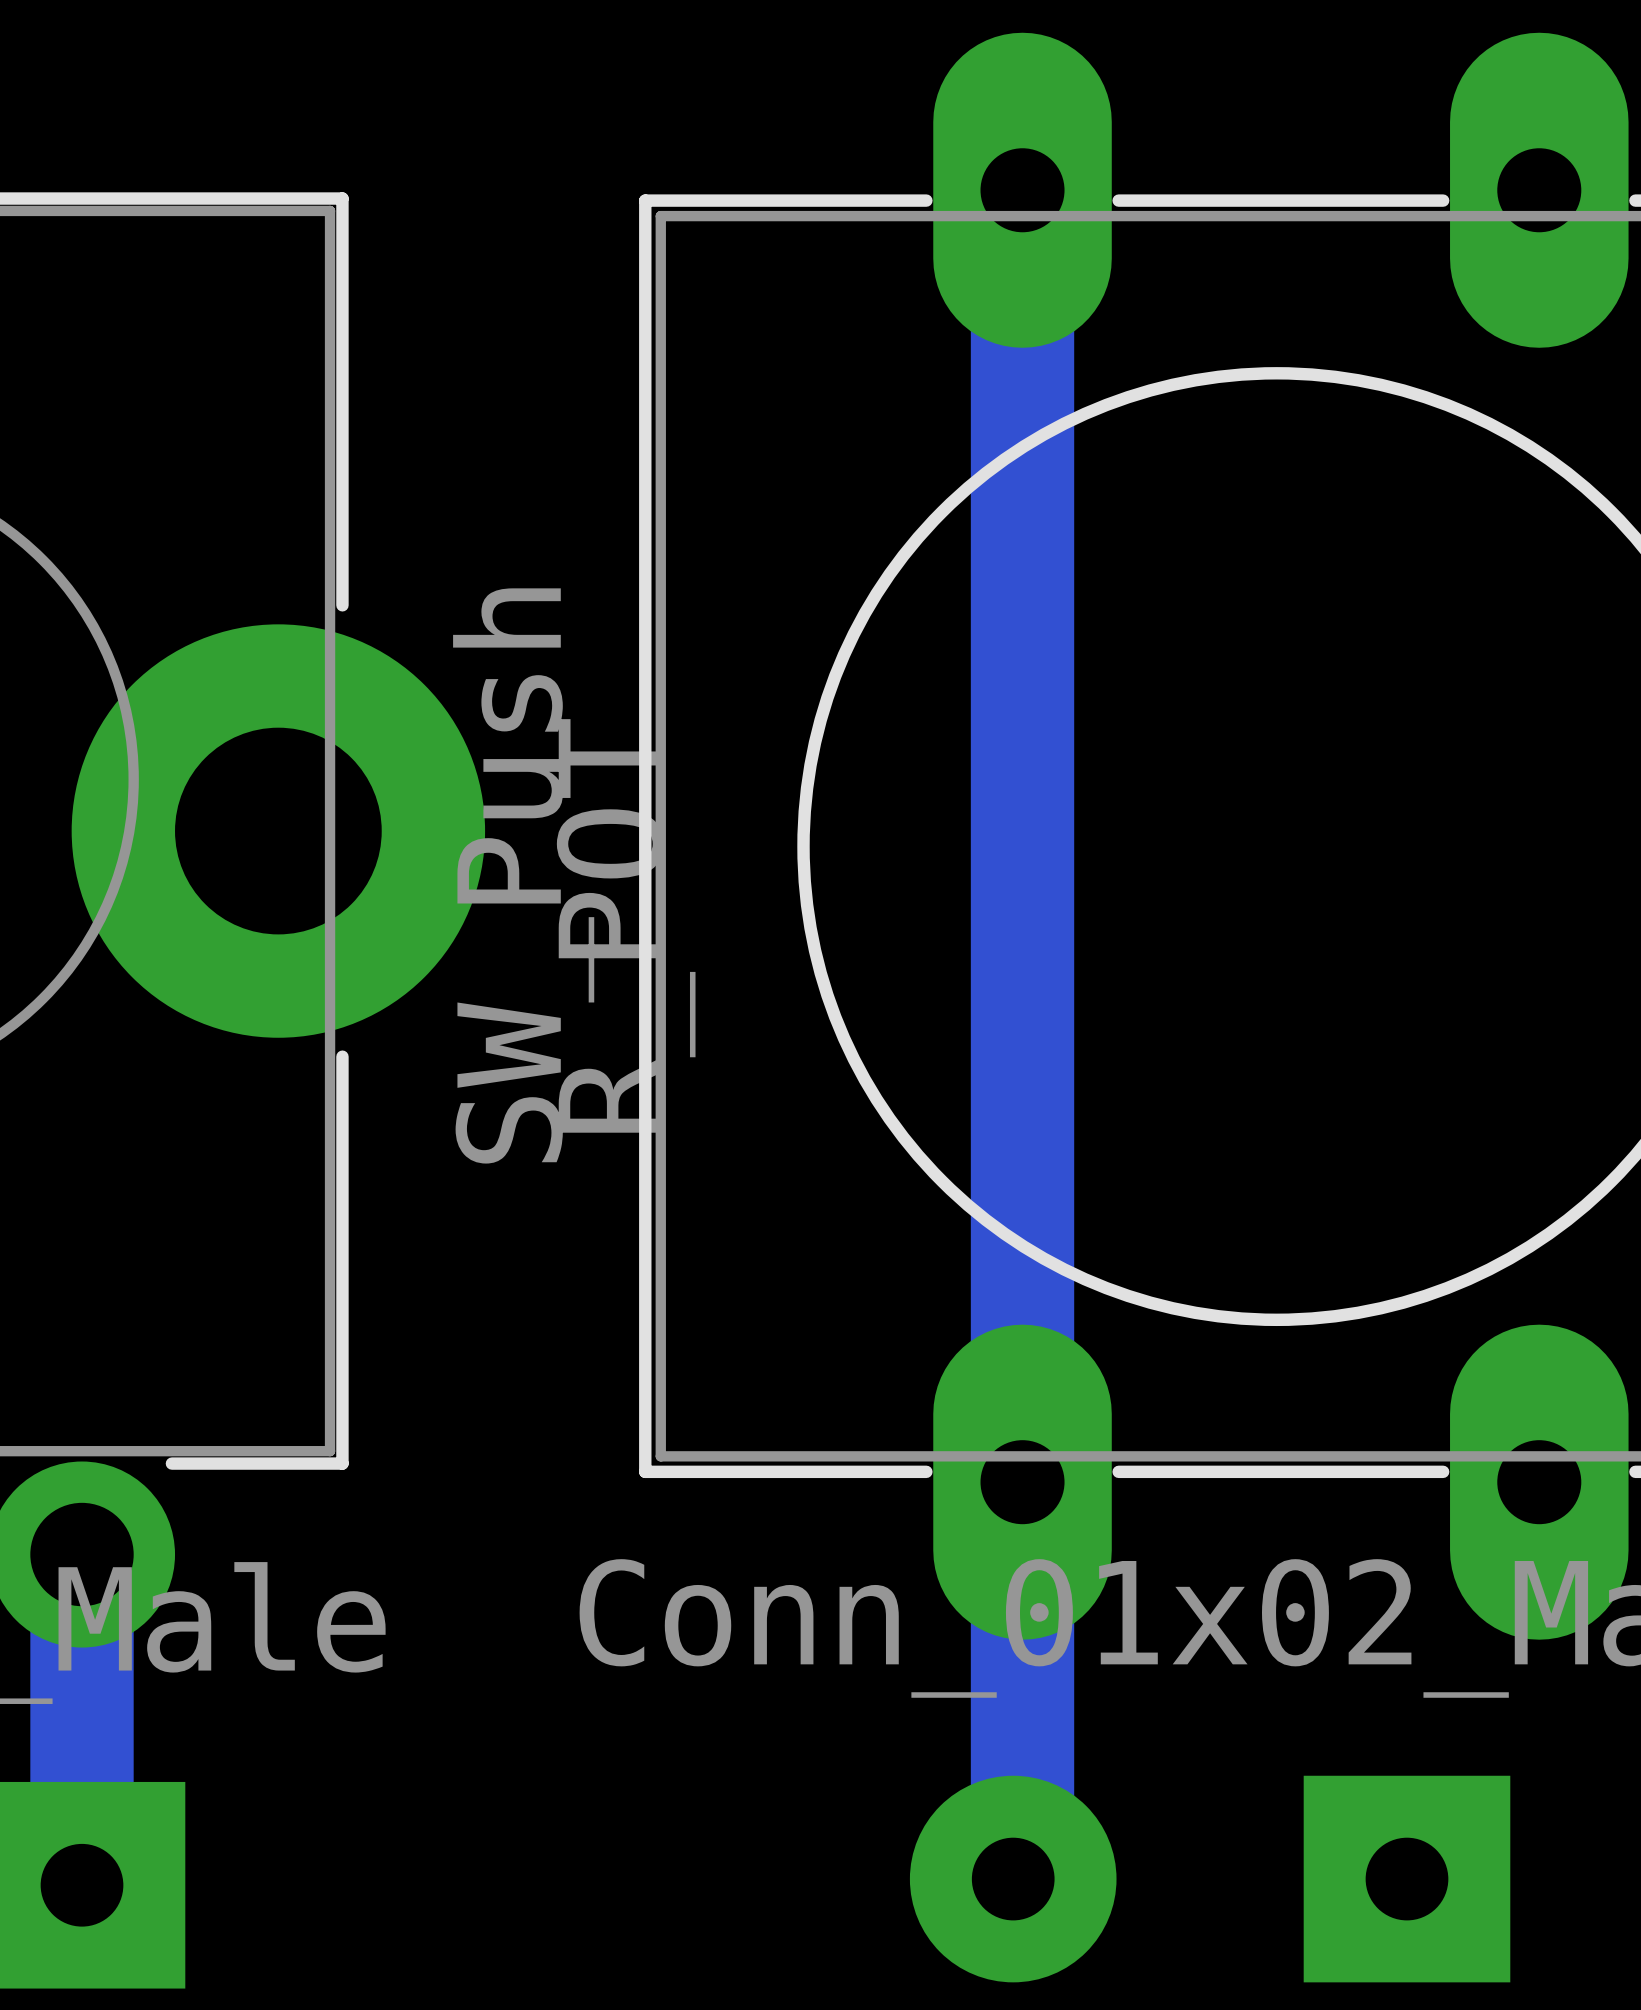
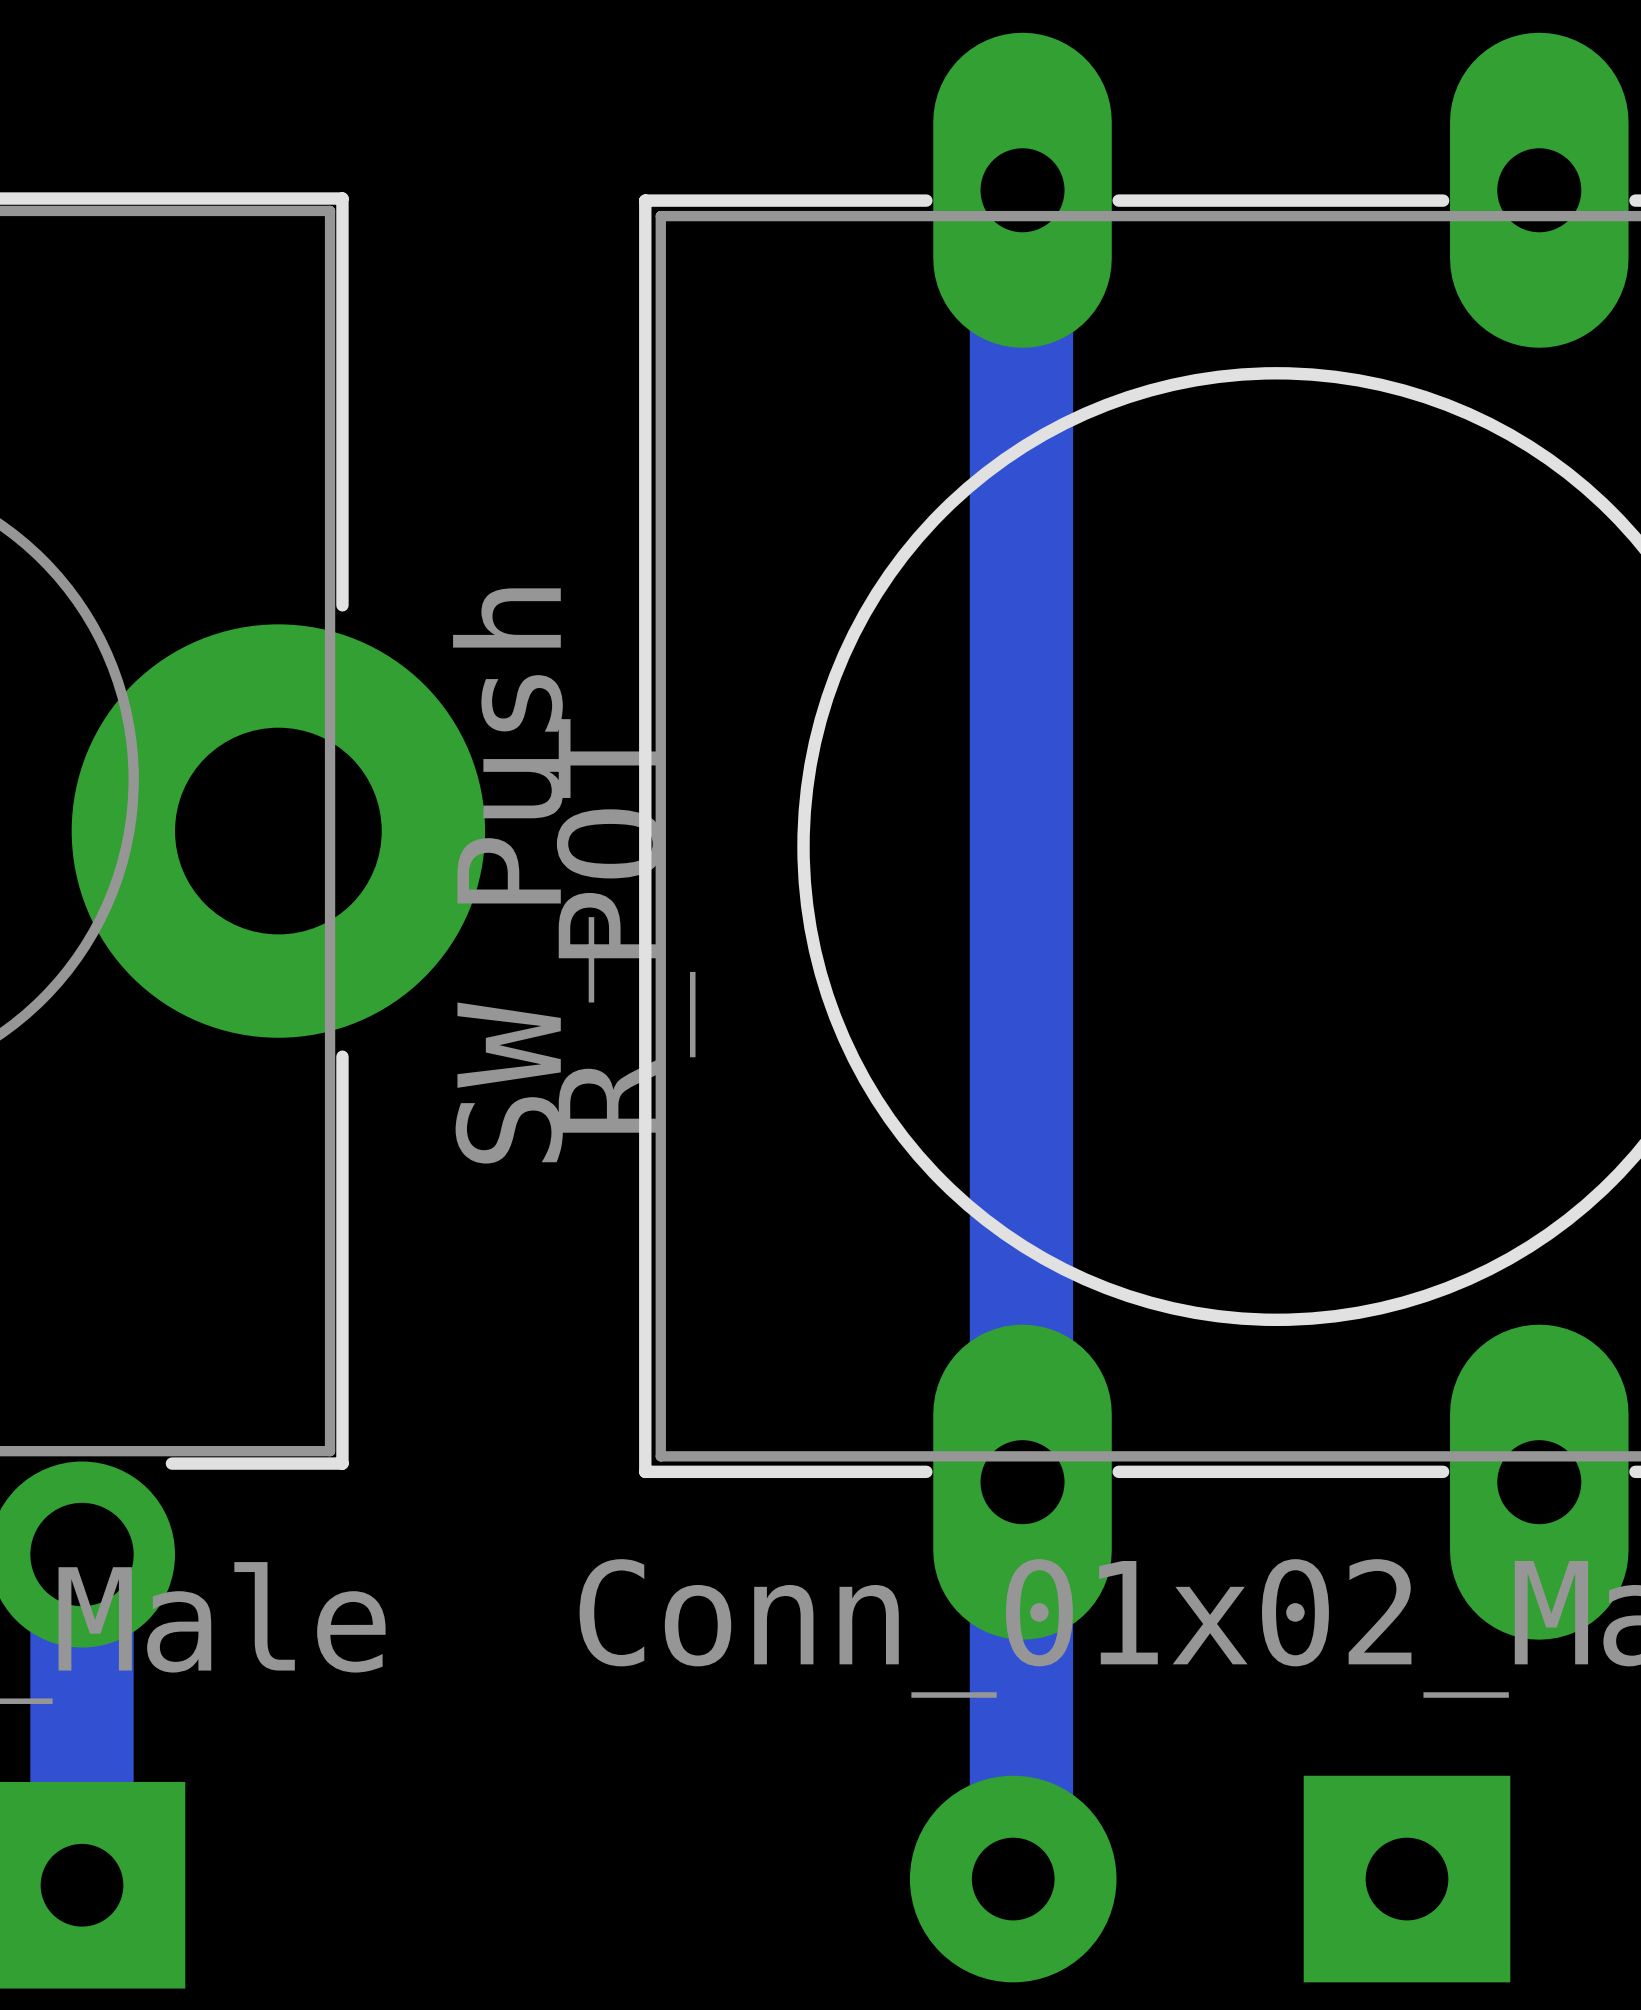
bottom track: (1022, 190) (1022, 1869) -> (1021, 172) (1021, 1870)

